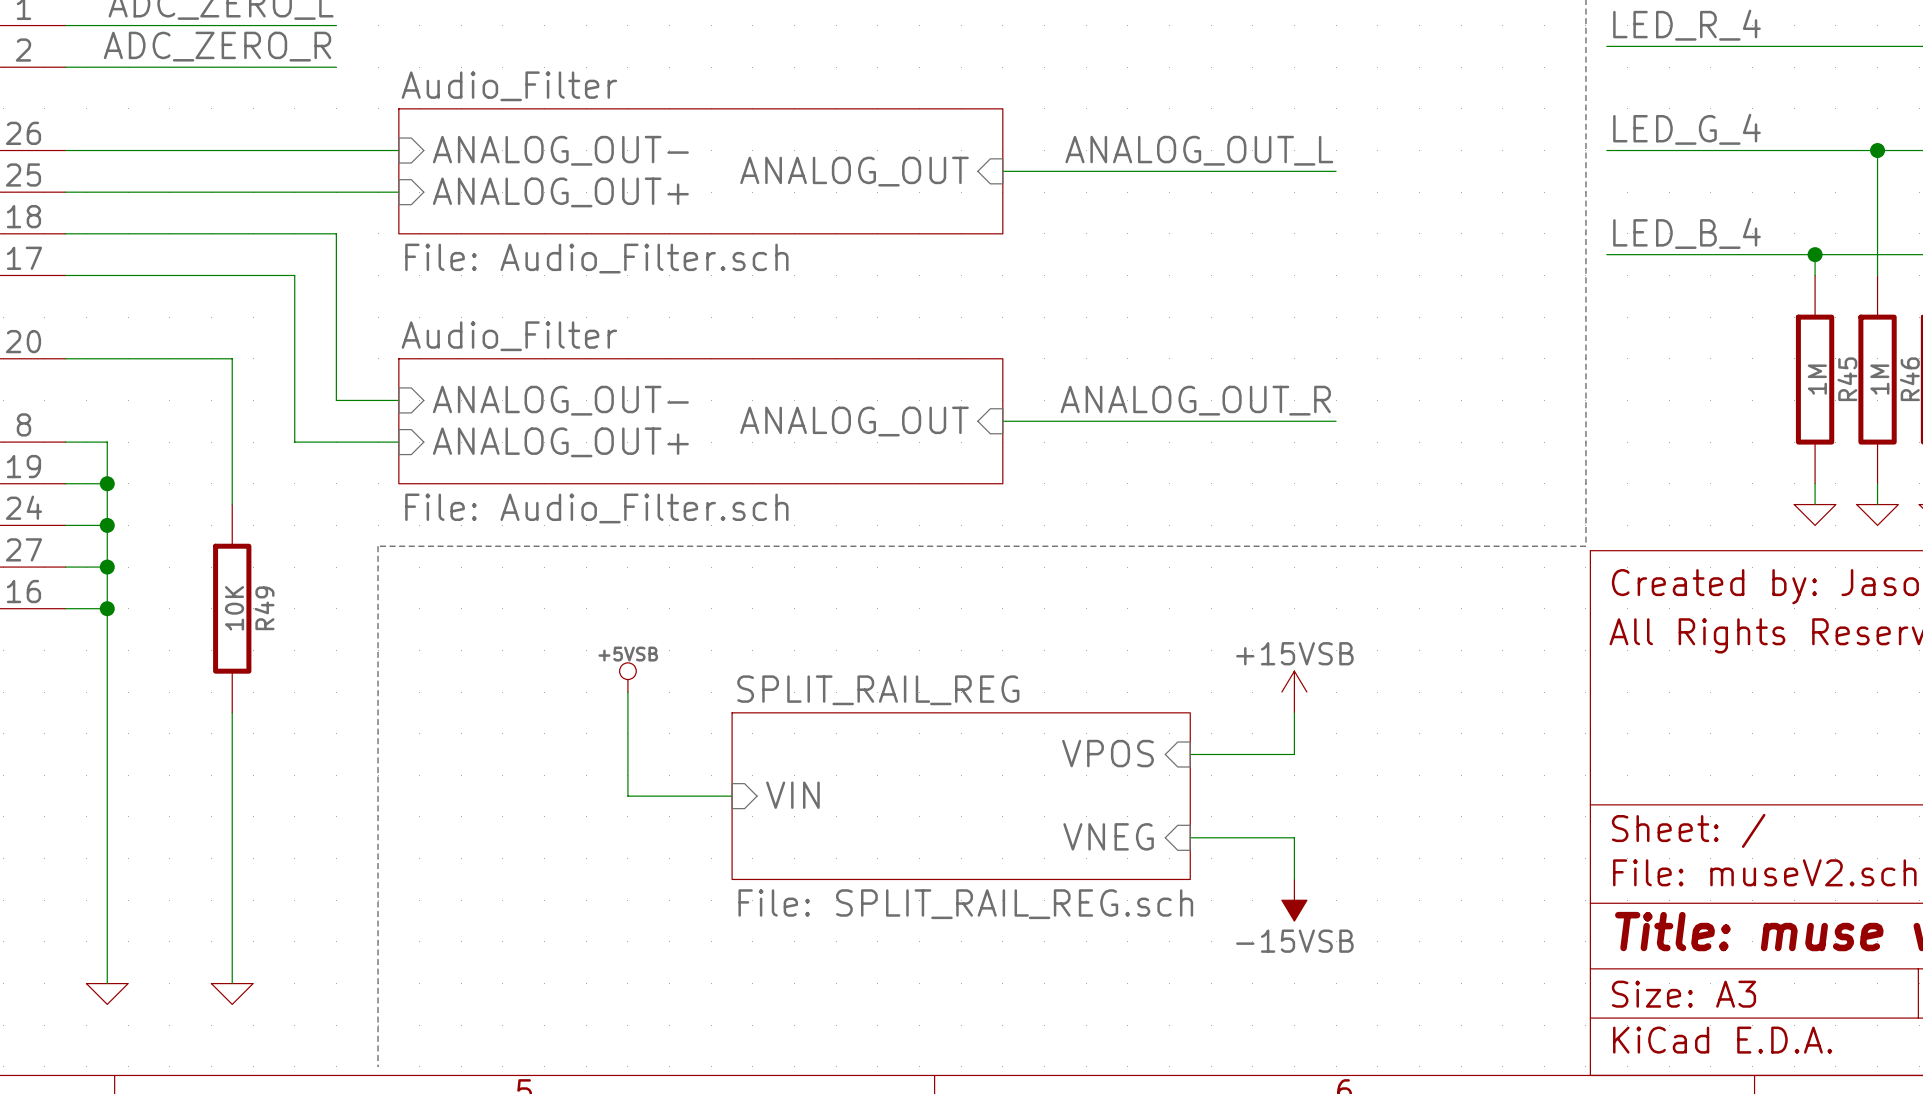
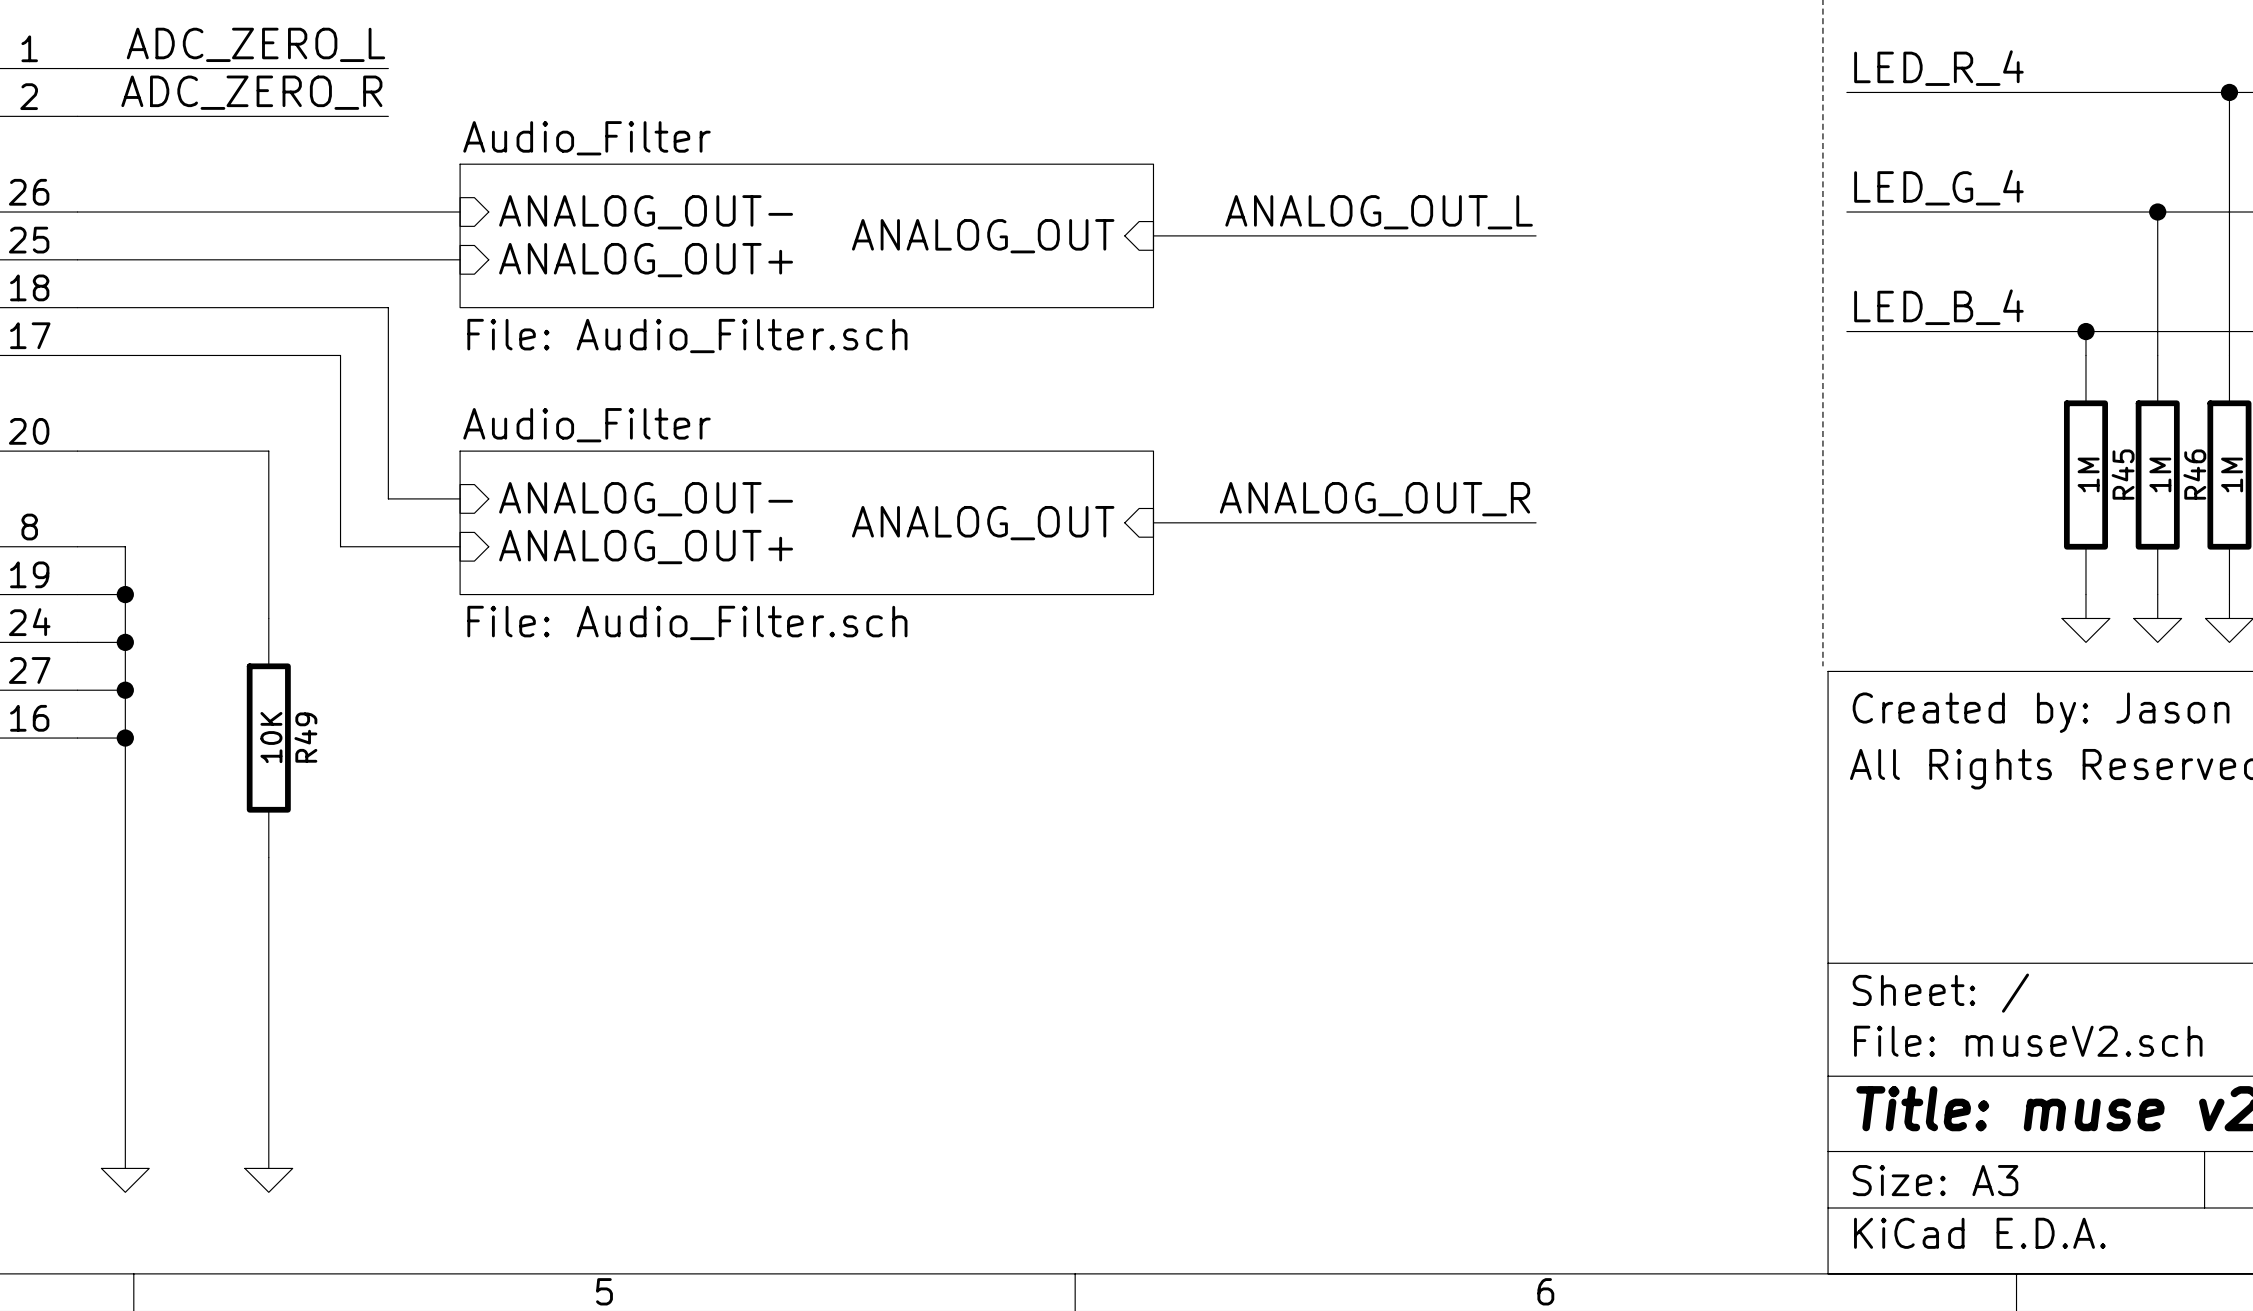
line: (1585, 546) (378, 546) (378, 1066) -> none
power symbol: +5VSB (627, 677) -> none
wire: (627, 692) (627, 796) (732, 796) -> none
power symbol: +15VSB (1294, 692) -> none
wire: (1294, 712) (1294, 754) (1190, 754) -> none
sheet pin: VPOS (1107, 753) -> none
sheet pin: VIN (792, 795) -> none
sheet SPLIT_RAIL_REG: File: SPLIT_RAIL_REG.sch (961, 796) -> none
sheet pin: VNEG (1108, 836) -> none
wire: (1190, 837) (1294, 837) (1294, 879) -> none
power symbol: -15VSB (1294, 900) -> none

